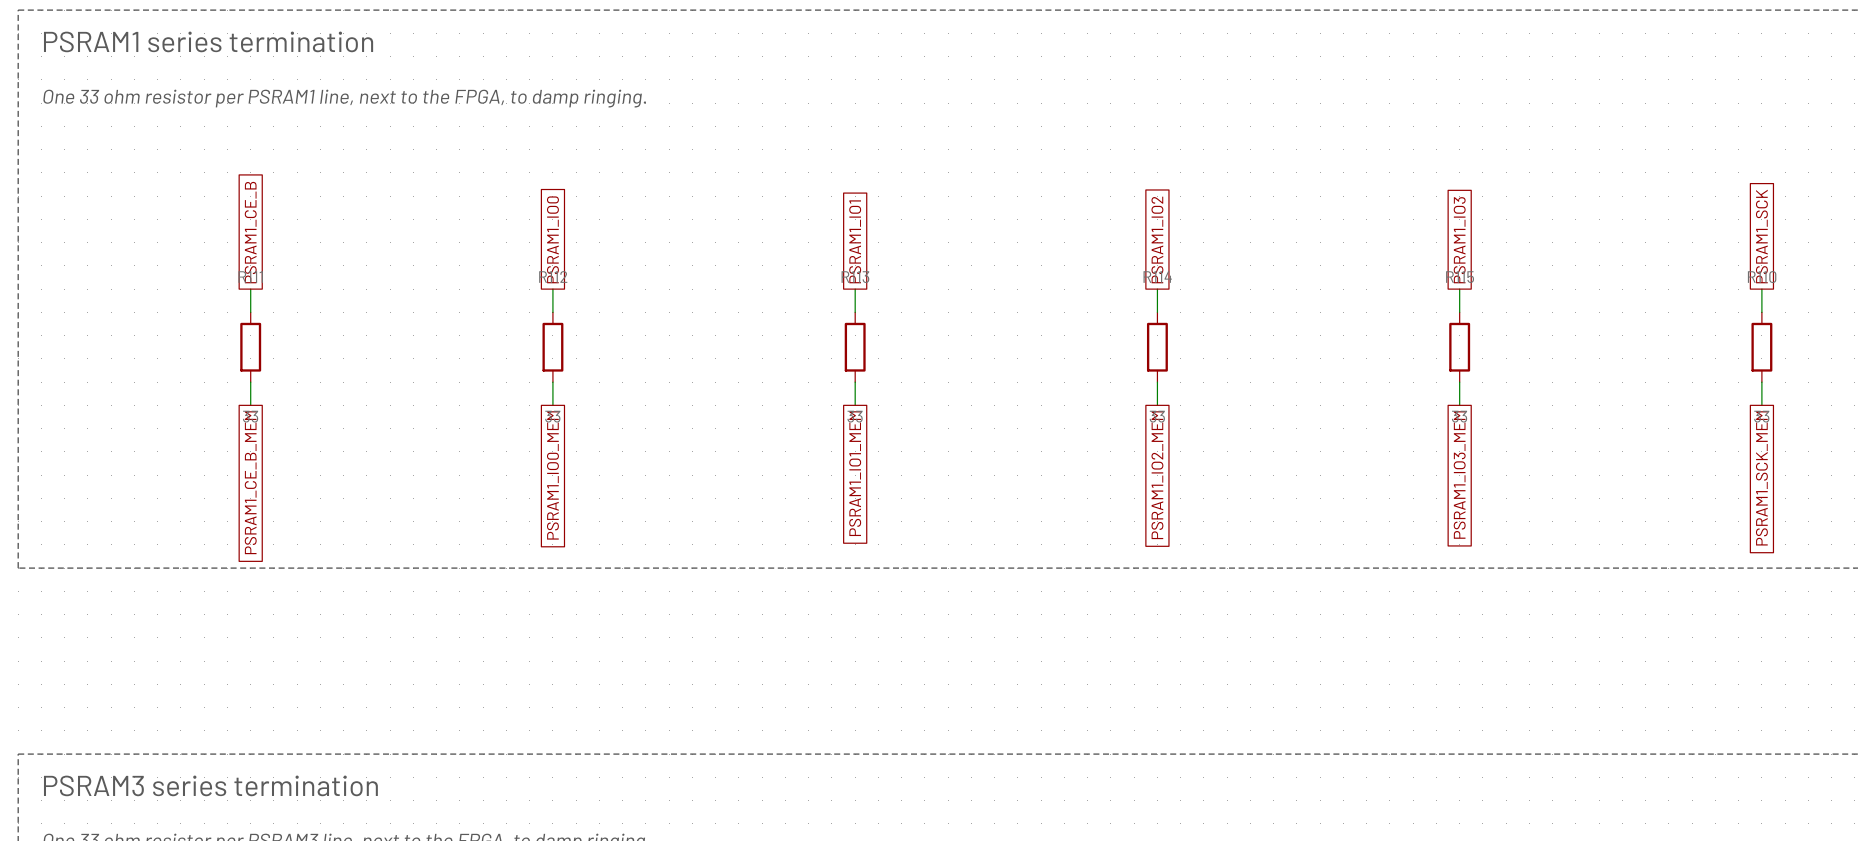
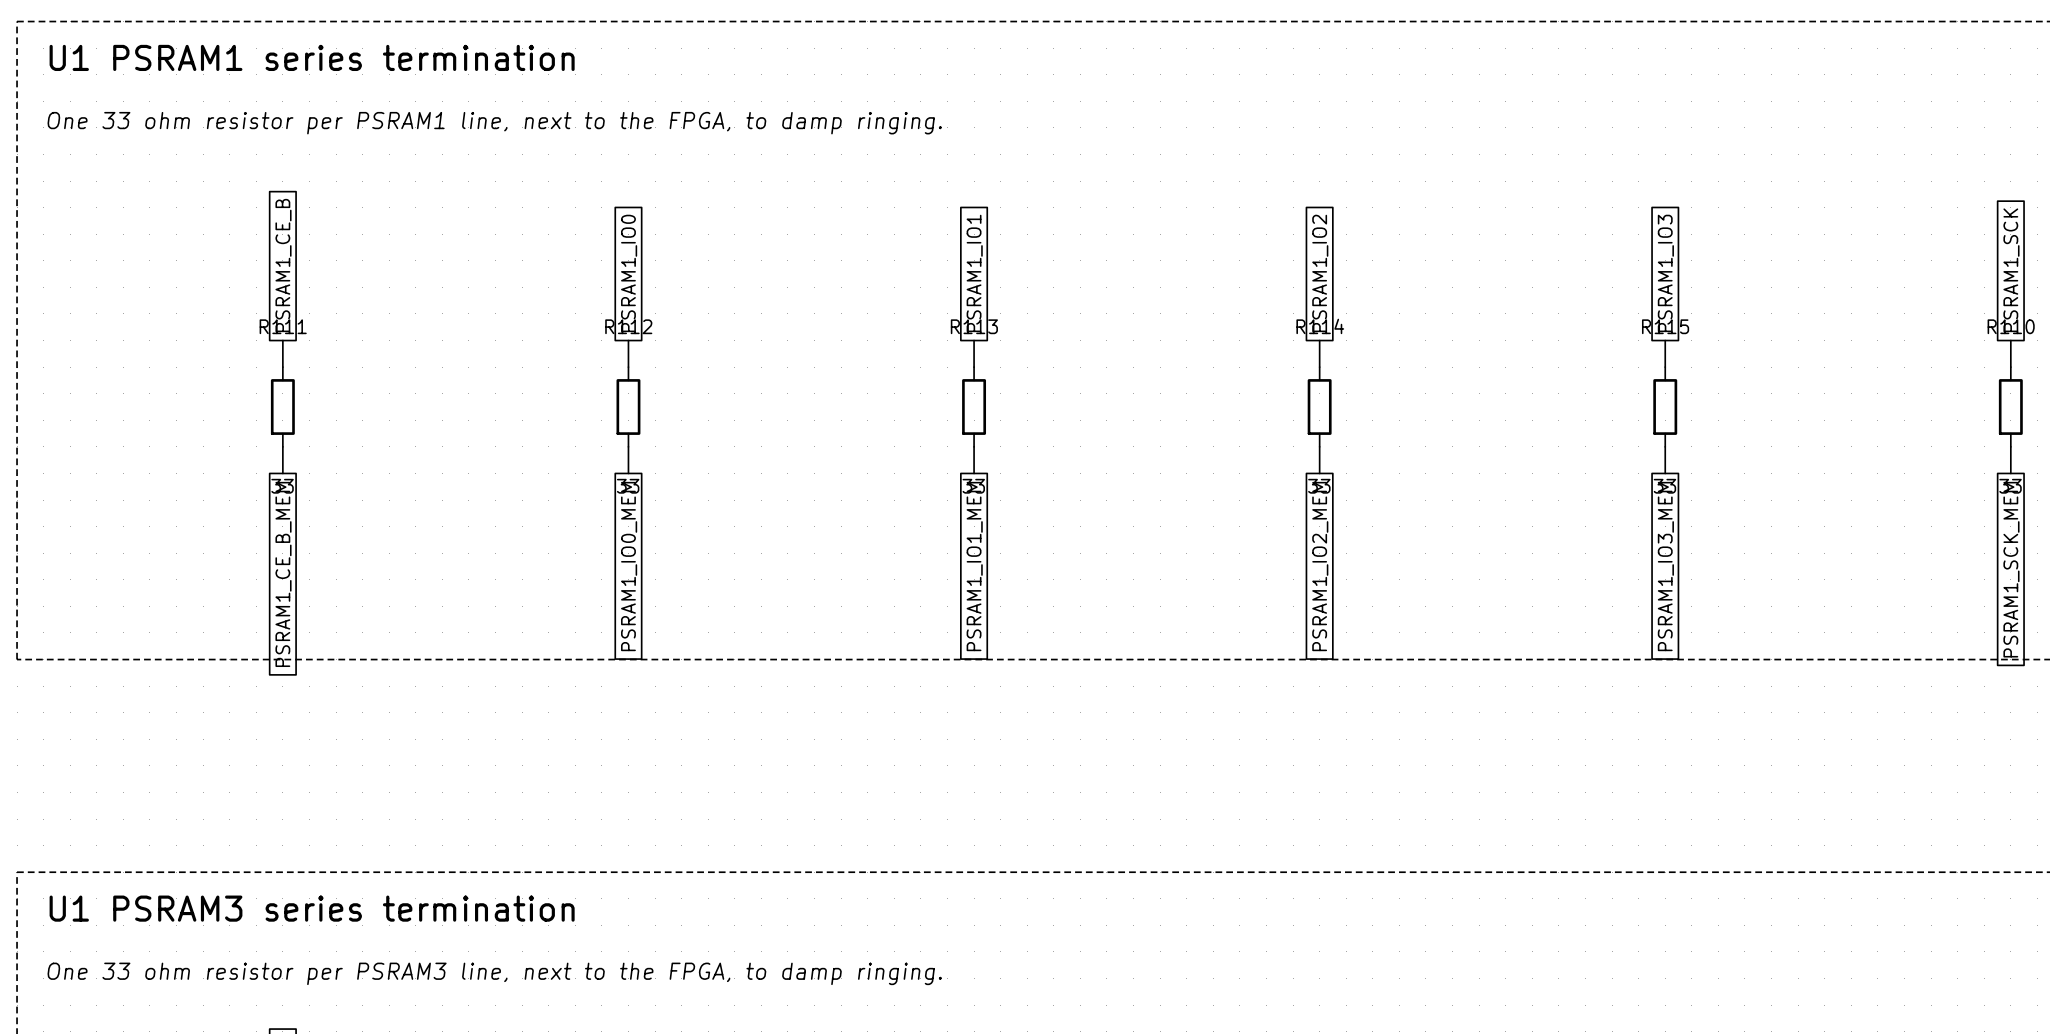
text: PSRAM1 series termination (208, 41) -> U1 PSRAM1 series termination (312, 57)
text: PSRAM3 series termination (210, 785) -> U1 PSRAM3 series termination (312, 908)

